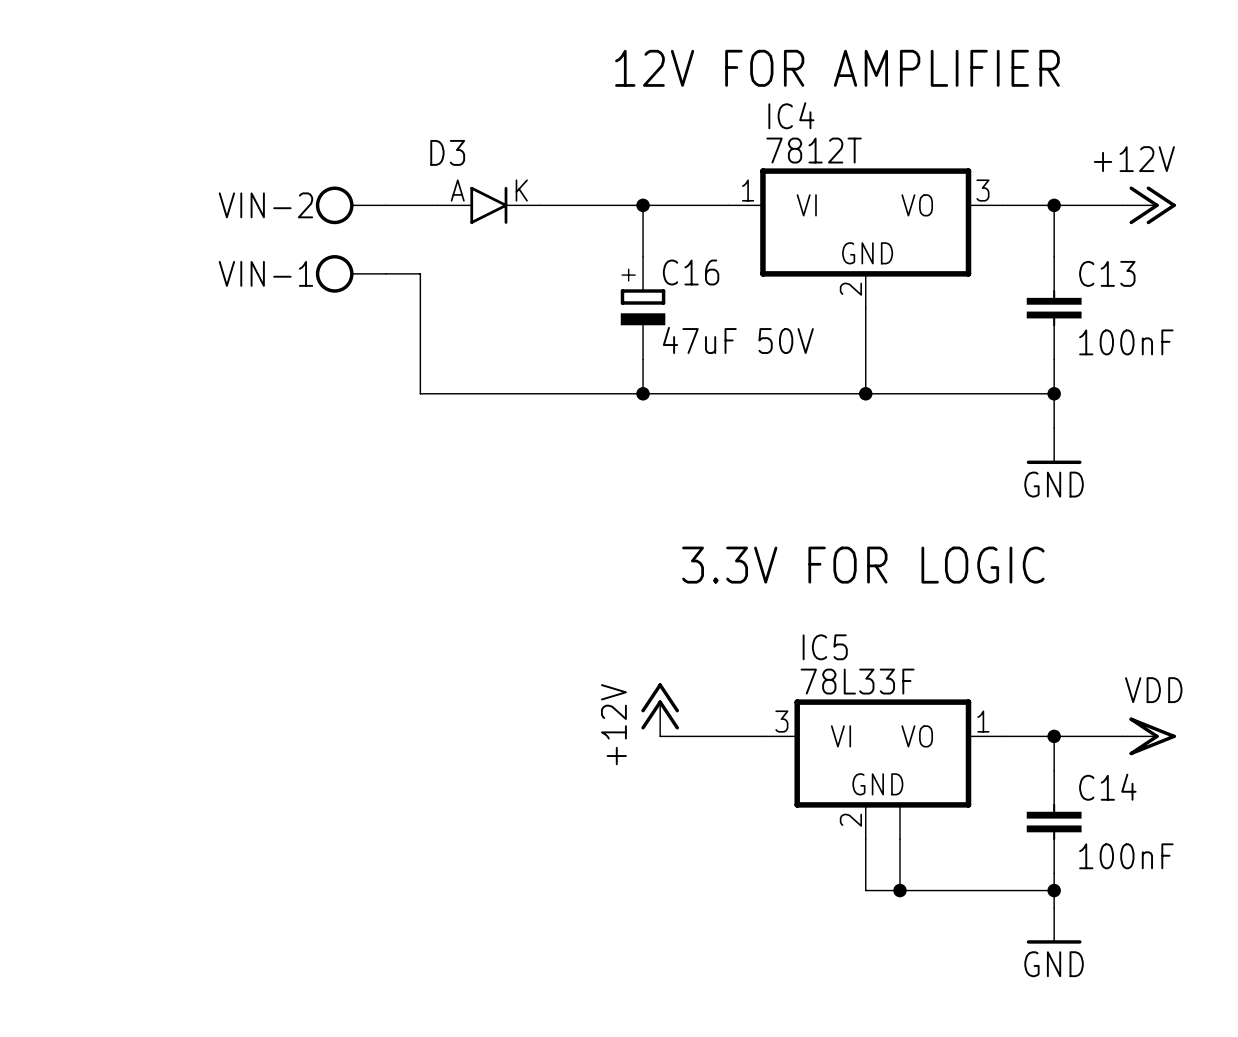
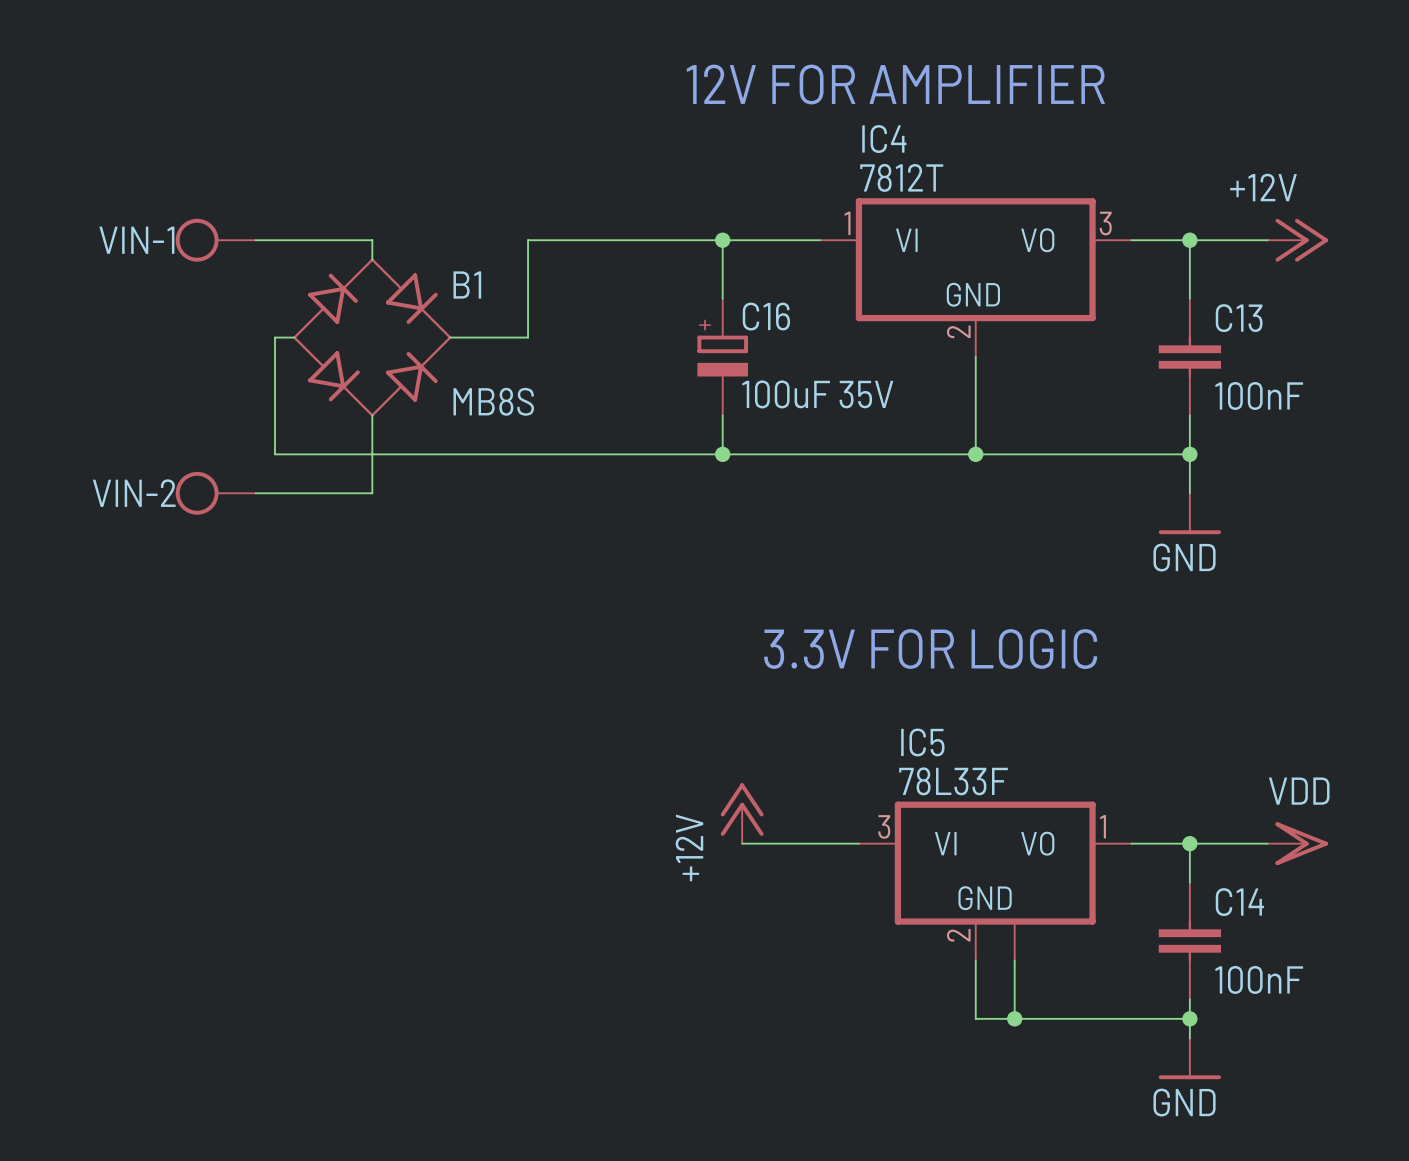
wire: none -> (255, 240) (372, 240) (372, 259)
VIN-2 position: (350, 205) -> (215, 493)
wire: (386, 205) (437, 205) -> none
D3: (488, 205) -> none
wire: none -> (605, 240) (528, 240) (528, 337) (450, 337)
VIN-1 position: (350, 273) -> (215, 240)
wire: (386, 273) (420, 273) (420, 393) -> (294, 337) (275, 337) (275, 454) (469, 454)
B1: none -> MB8S (372, 337)
C16 value: 47uF 50V (738, 340) -> 100uF 35V (817, 394)
wire: none -> (372, 415) (372, 493) (255, 493)

